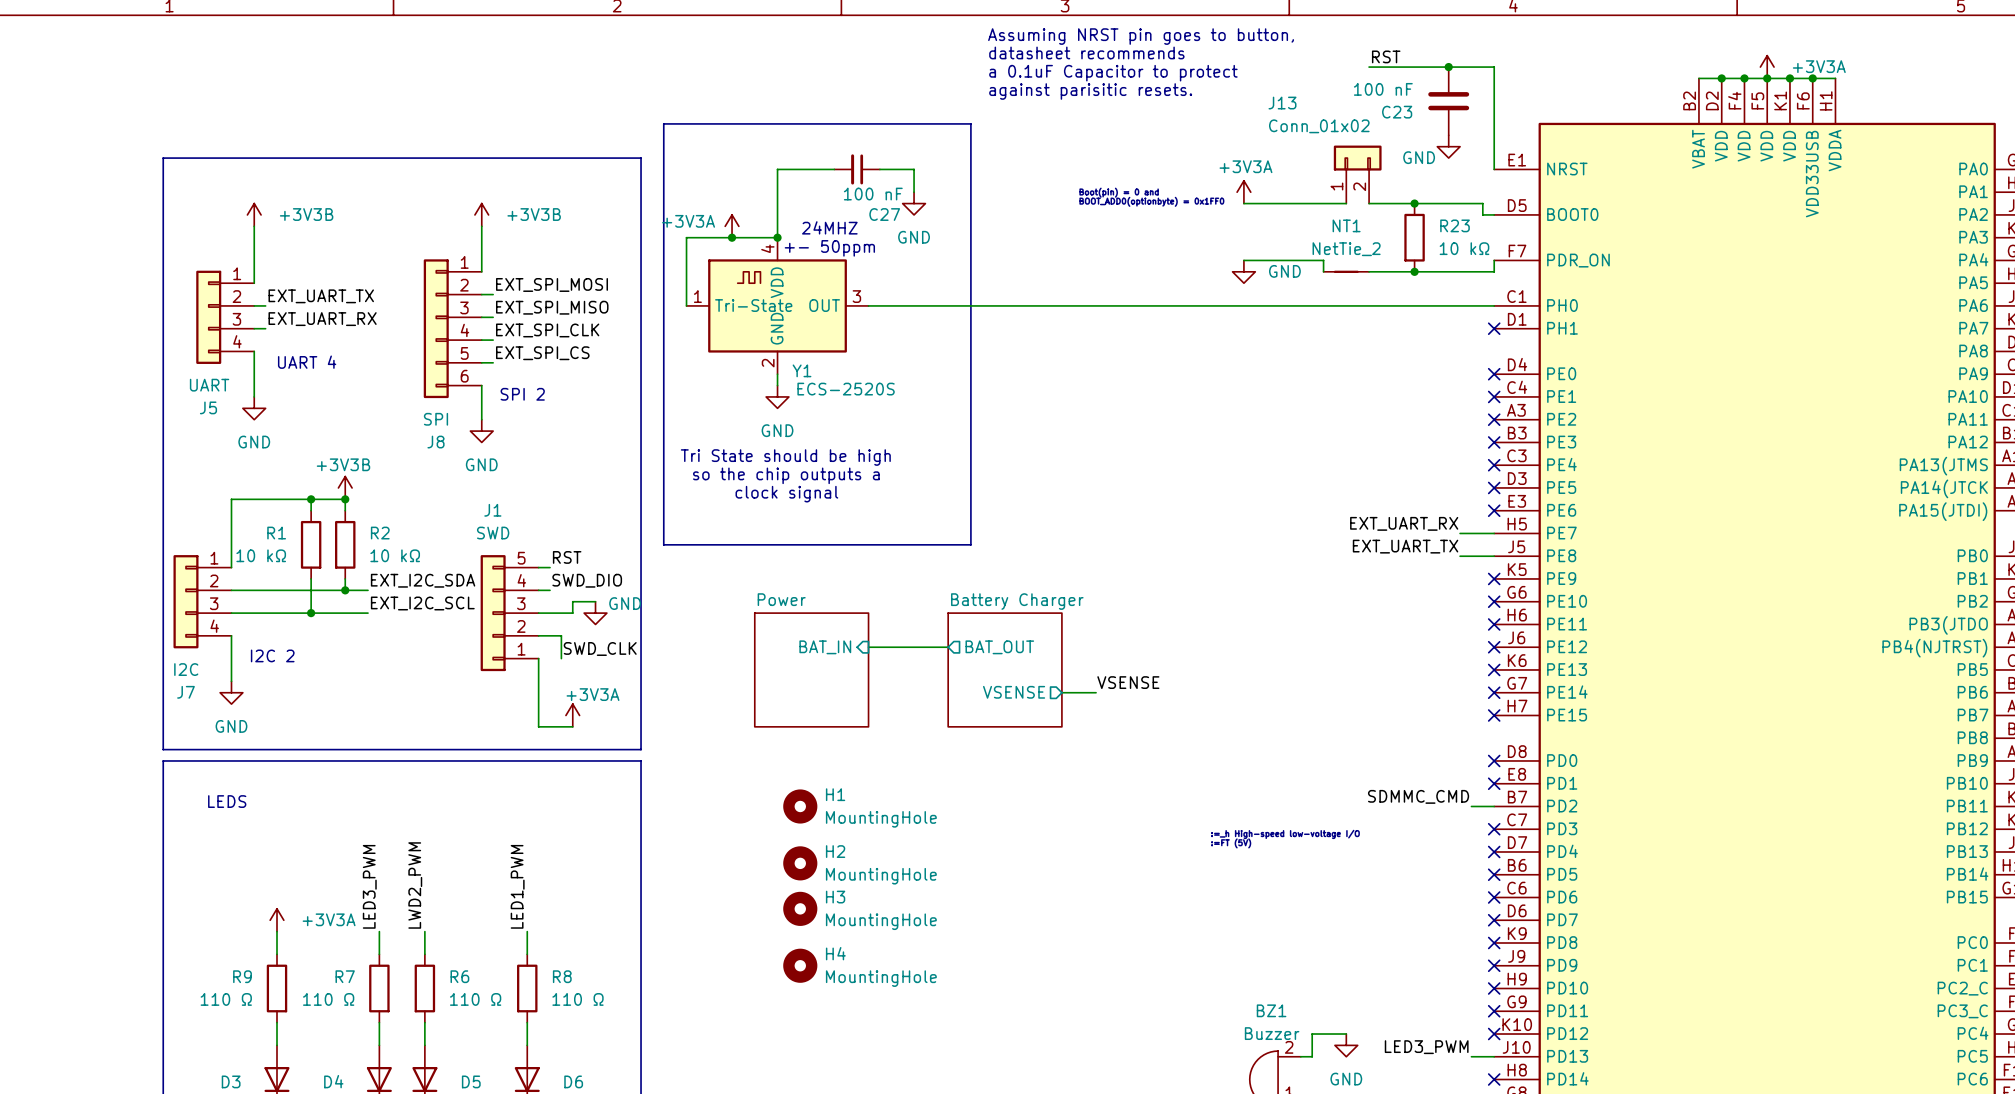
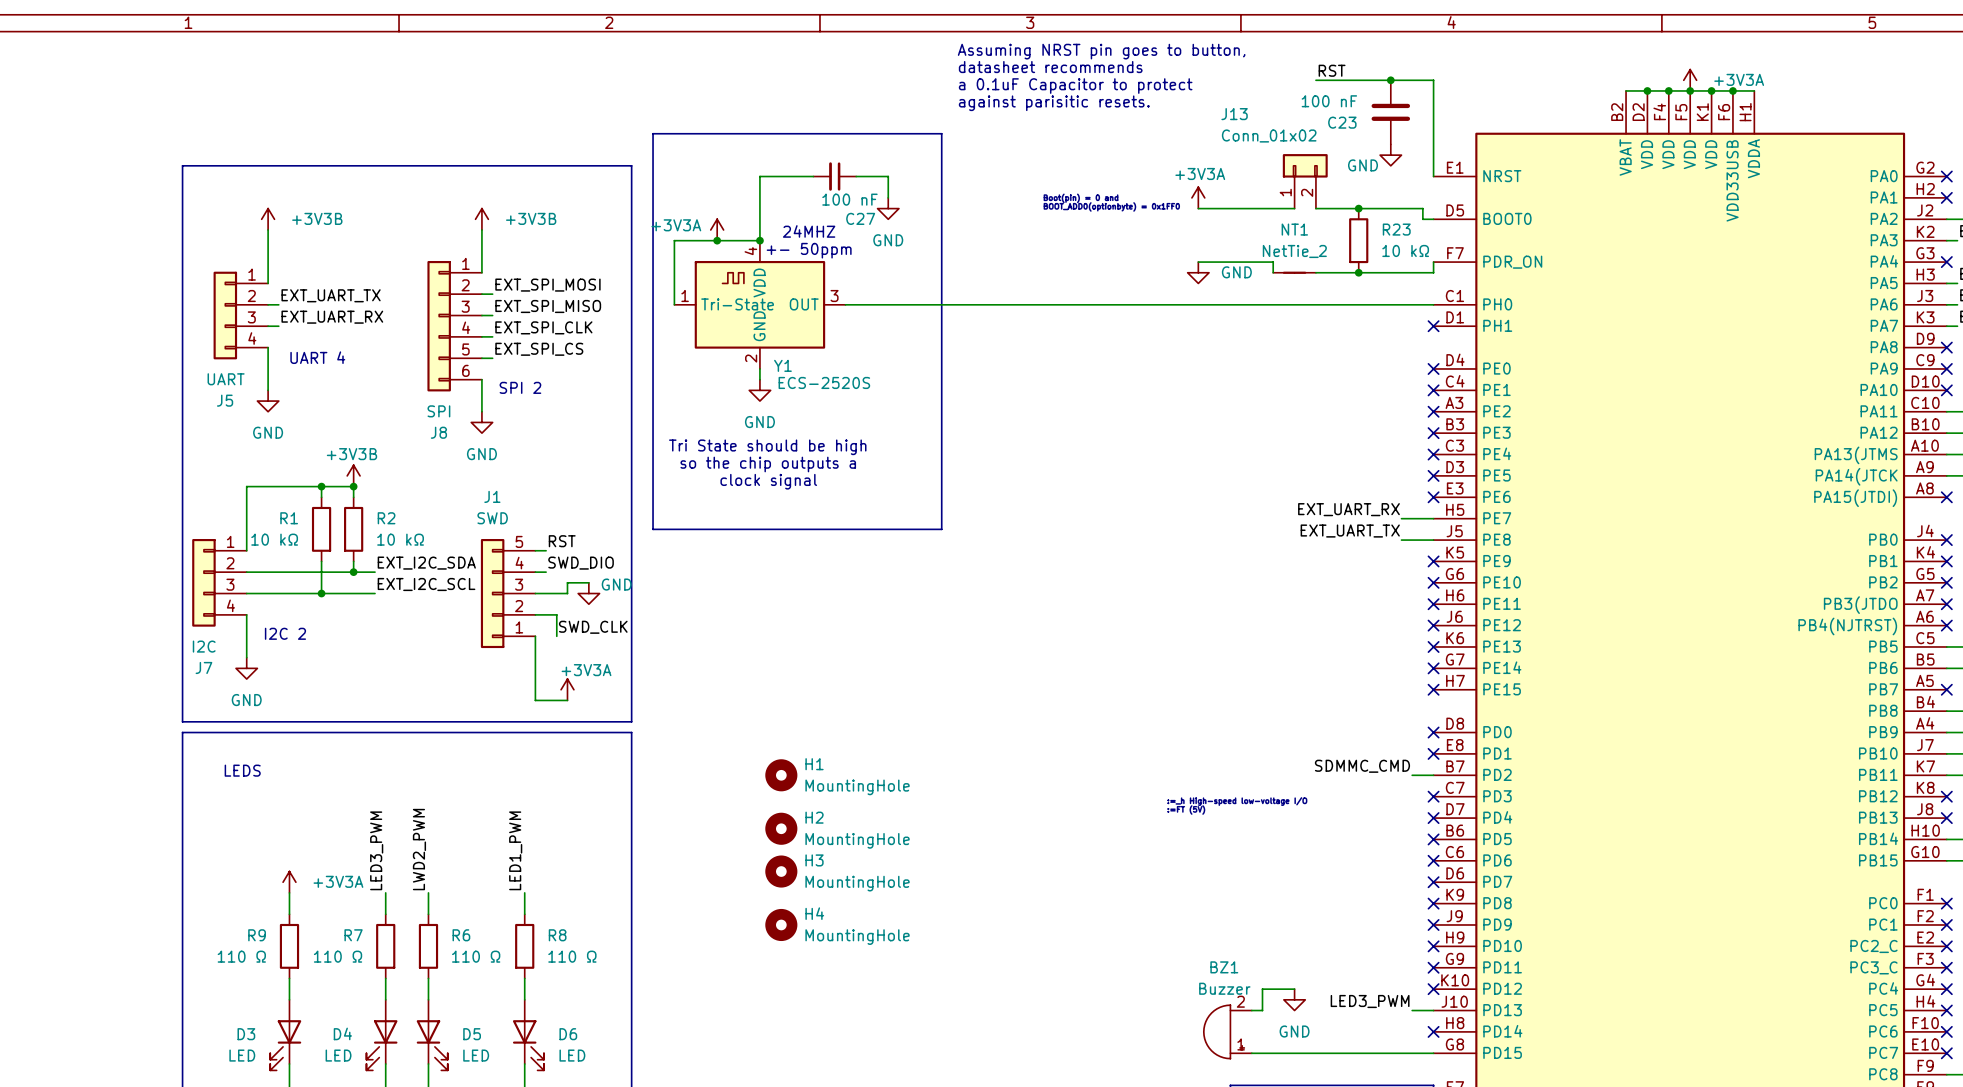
sheet pin: BAT_IN (825, 647) -> none
wire: (868, 647) (948, 647) -> none
sheet pin: BAT_OUT (999, 647) -> none
sheet Power: (811, 669) -> none
sheet Battery Charger: (1005, 669) -> none
label: VSENSE (1128, 682) -> none
sheet pin: VSENSE (1014, 692) -> none
wire: (1061, 692) (1096, 692) -> none

